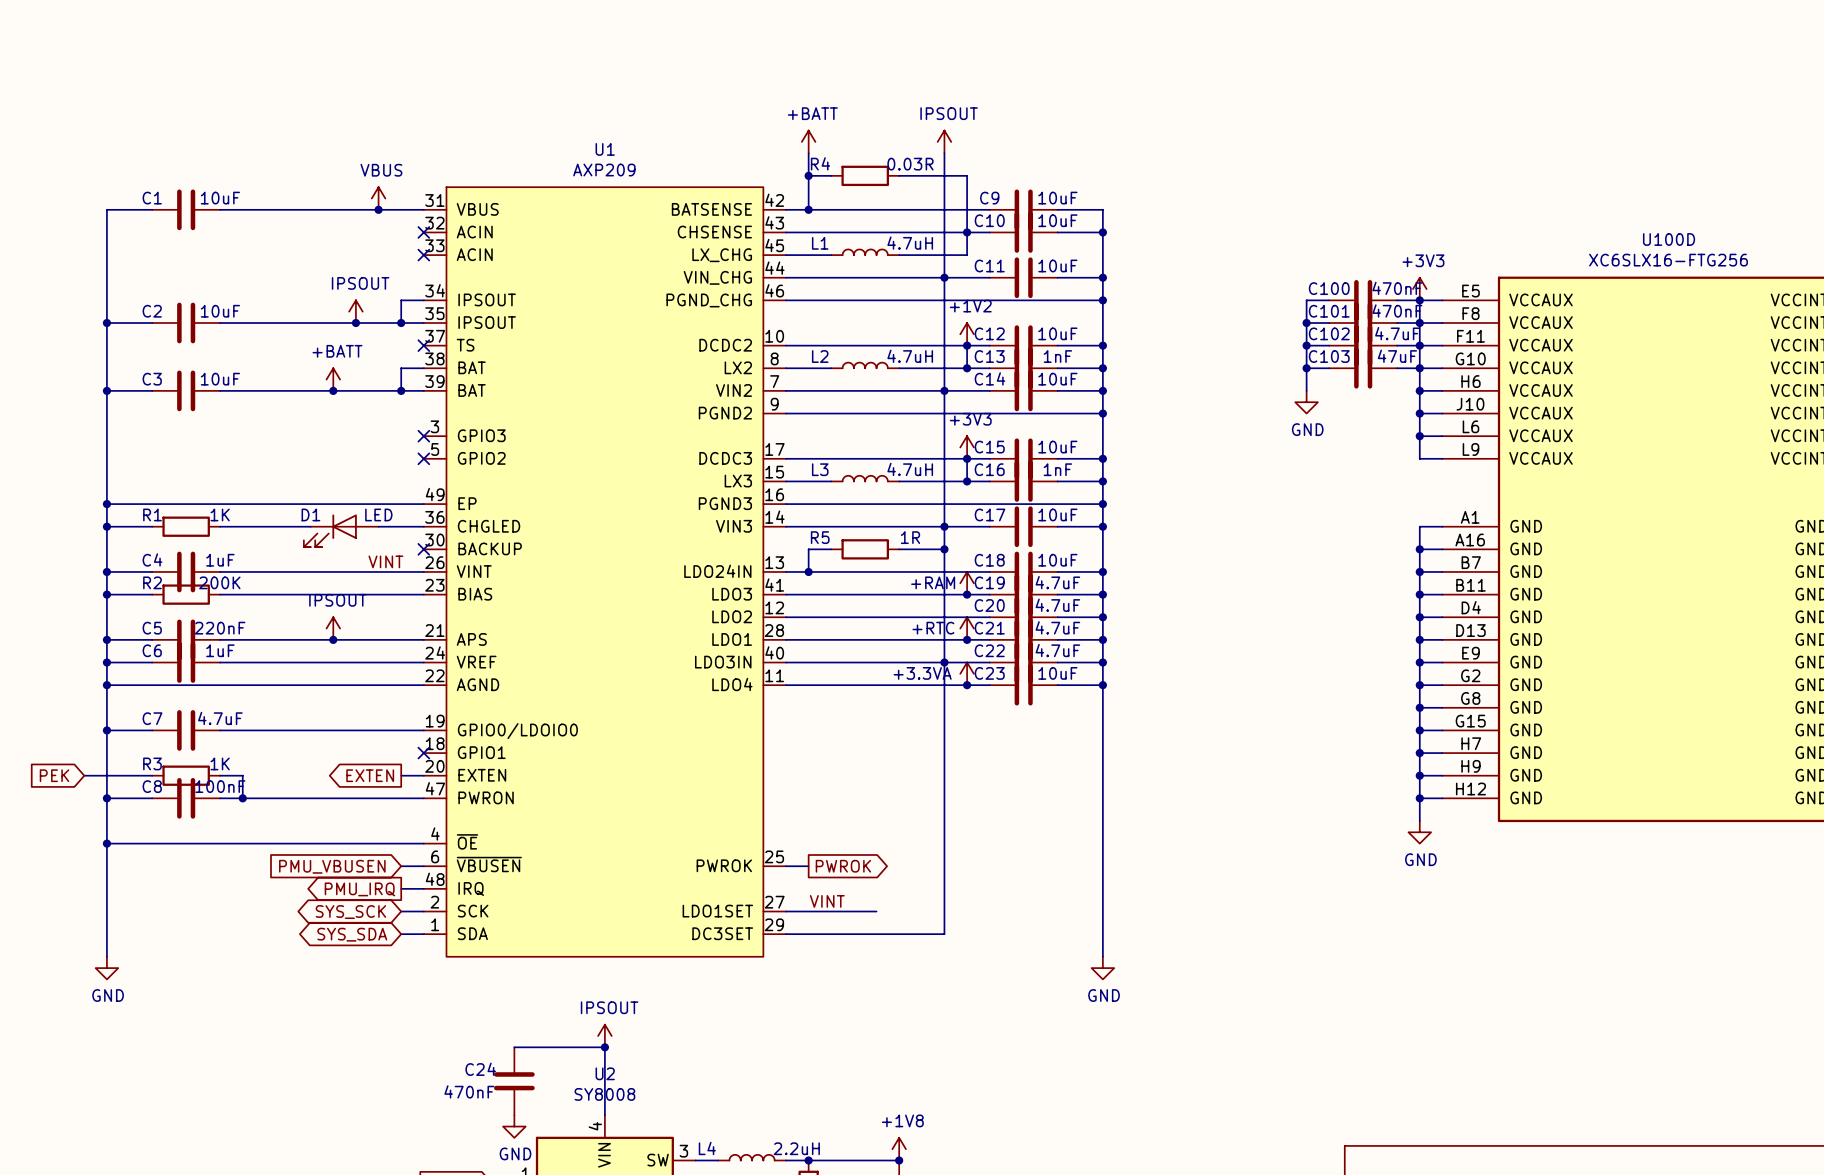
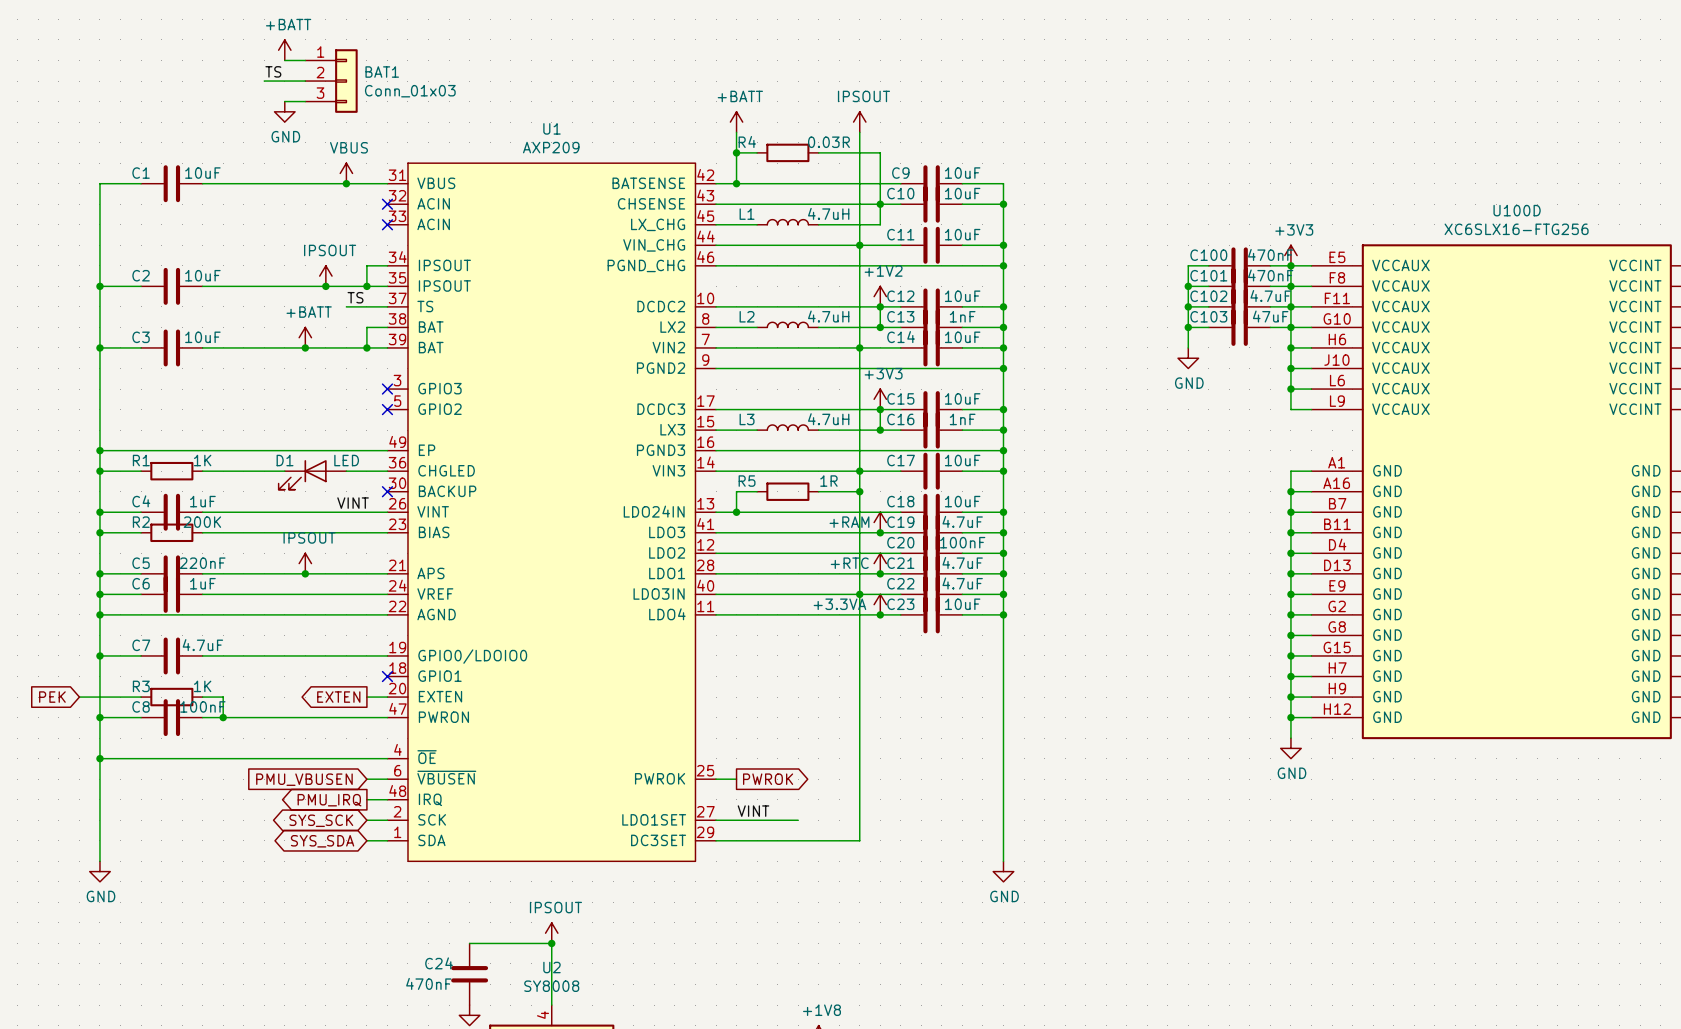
power symbol: none -> +BATT (284, 50)
wire: none -> (284, 60) (305, 60)
label: none -> TS (273, 71)
wire: none -> (264, 81) (305, 81)
BAT1: none -> Conn_01x03 (331, 81)
wire: none -> (284, 101) (305, 101)
power symbol: none -> GND (284, 111)
label: none -> TS (355, 297)
wire: none -> (346, 306) (387, 306)
no-connect mark: (423, 345) -> none
C20 value: 4.7uF (1057, 605) -> 100nF (962, 542)

